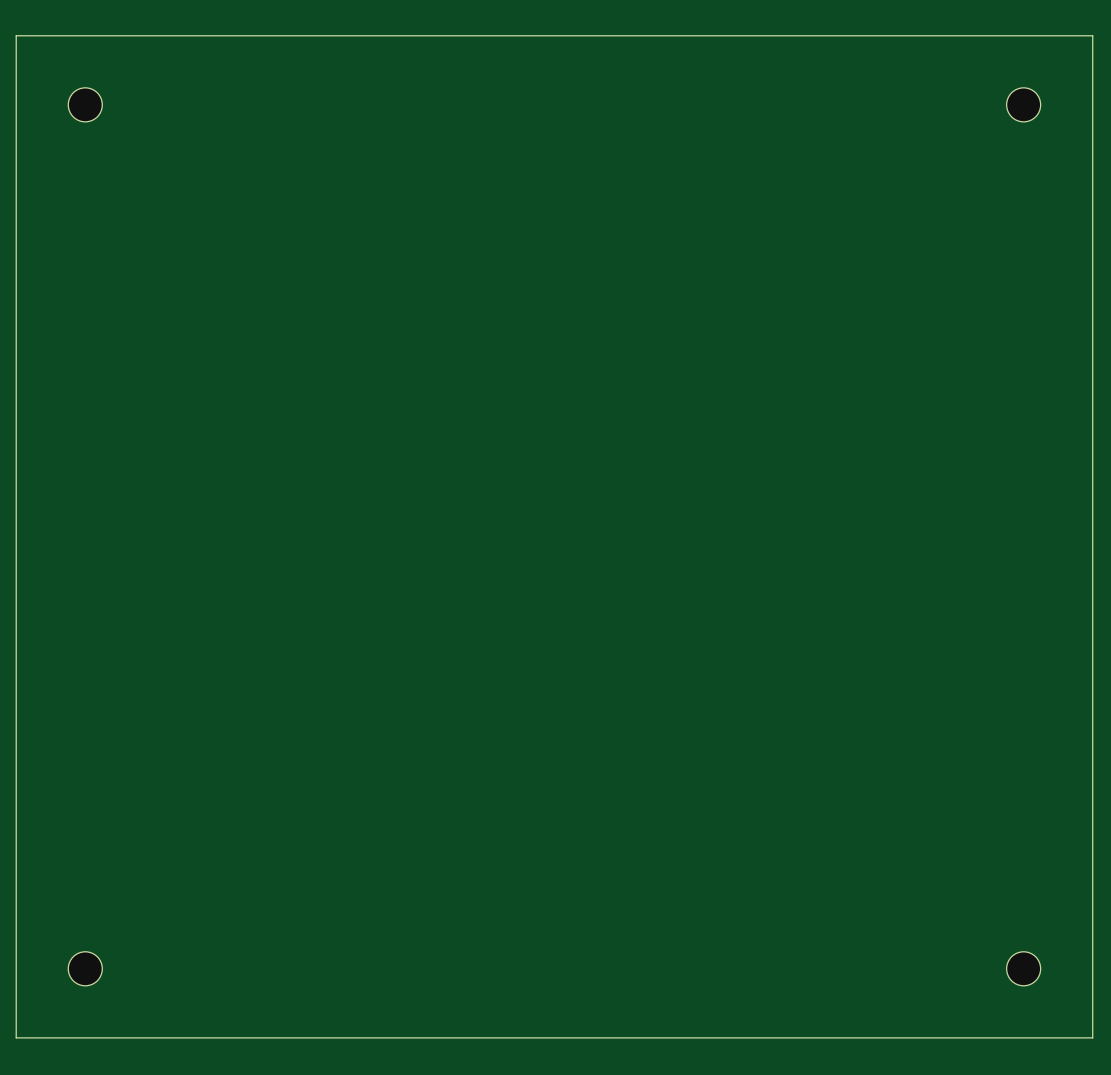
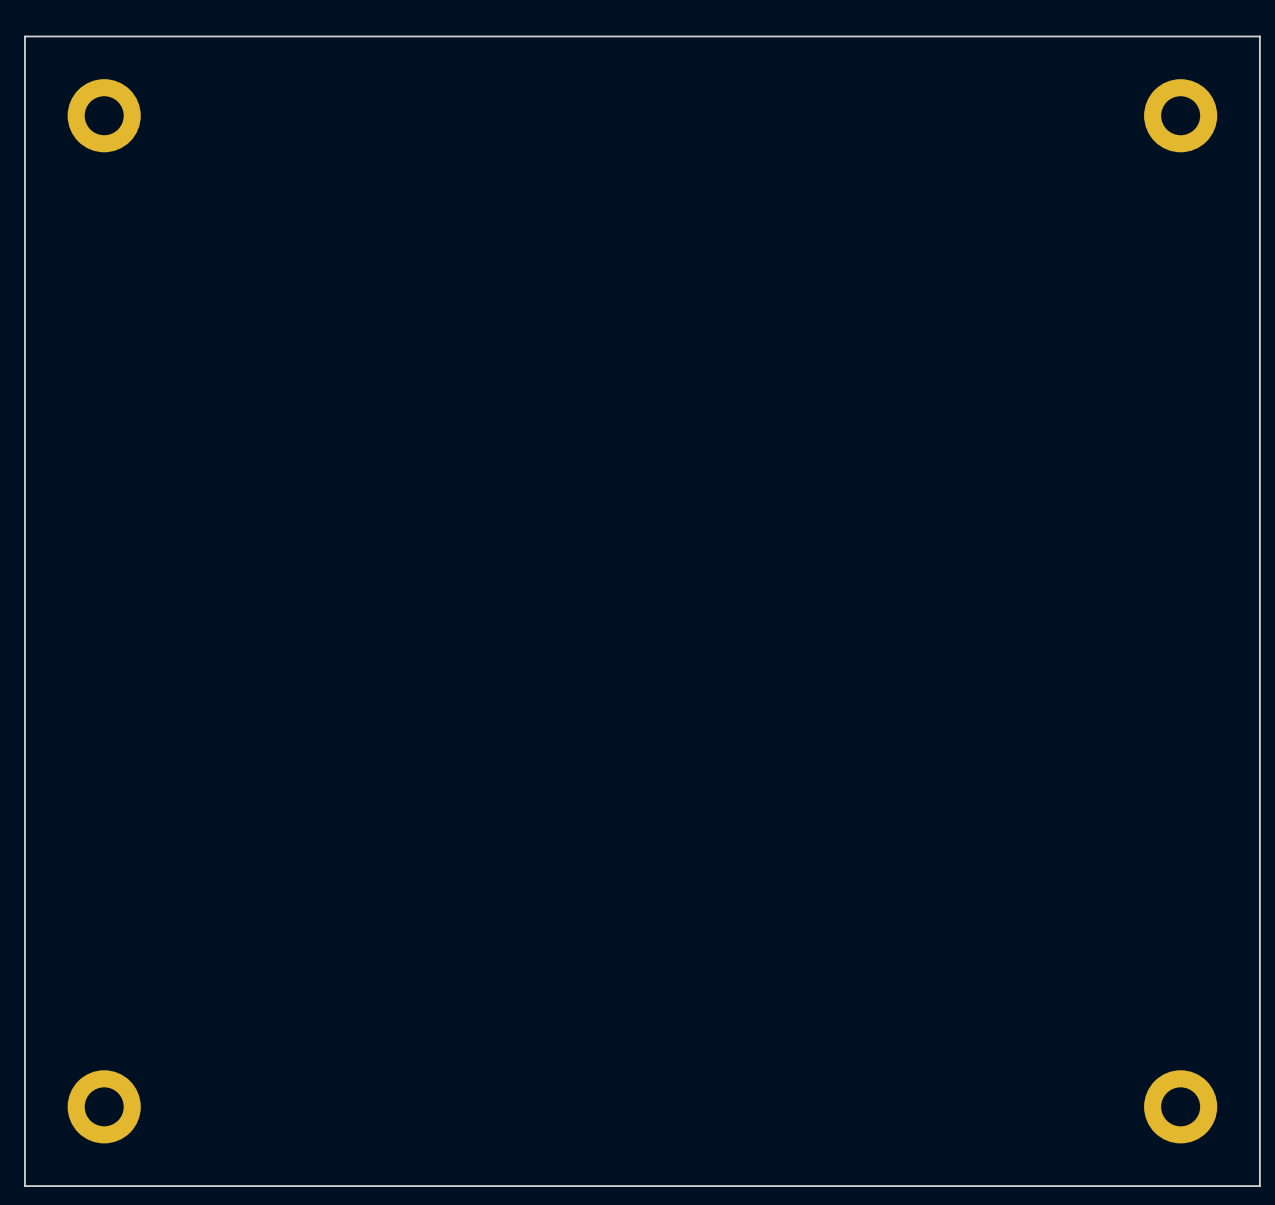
part footprint: [68, 87, 103, 122] -> [67, 79, 141, 153]
part footprint: [1006, 87, 1041, 122] -> [1144, 79, 1218, 153]
part footprint: [68, 951, 103, 986] -> [67, 1070, 141, 1144]
part footprint: [1006, 951, 1041, 986] -> [1144, 1070, 1218, 1144]

